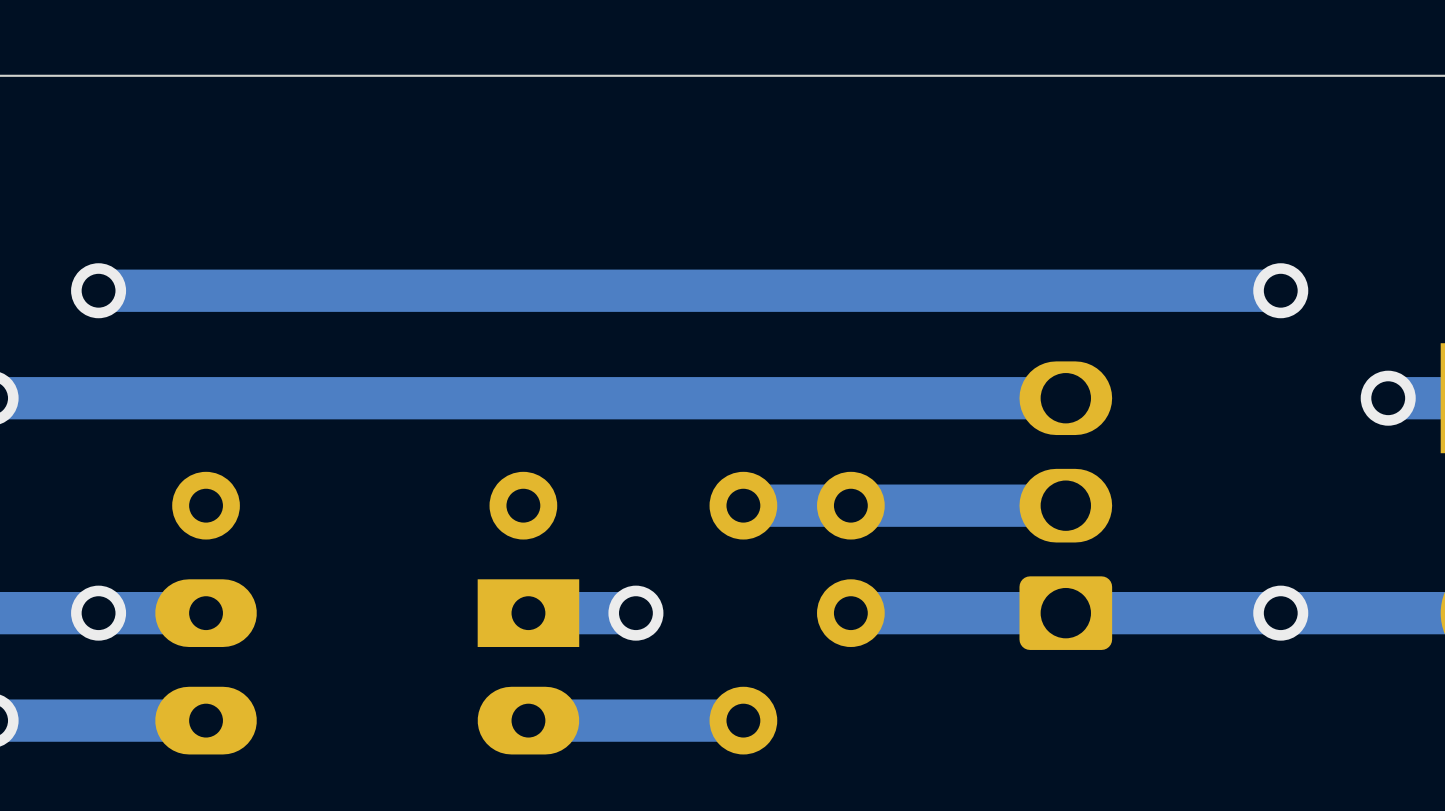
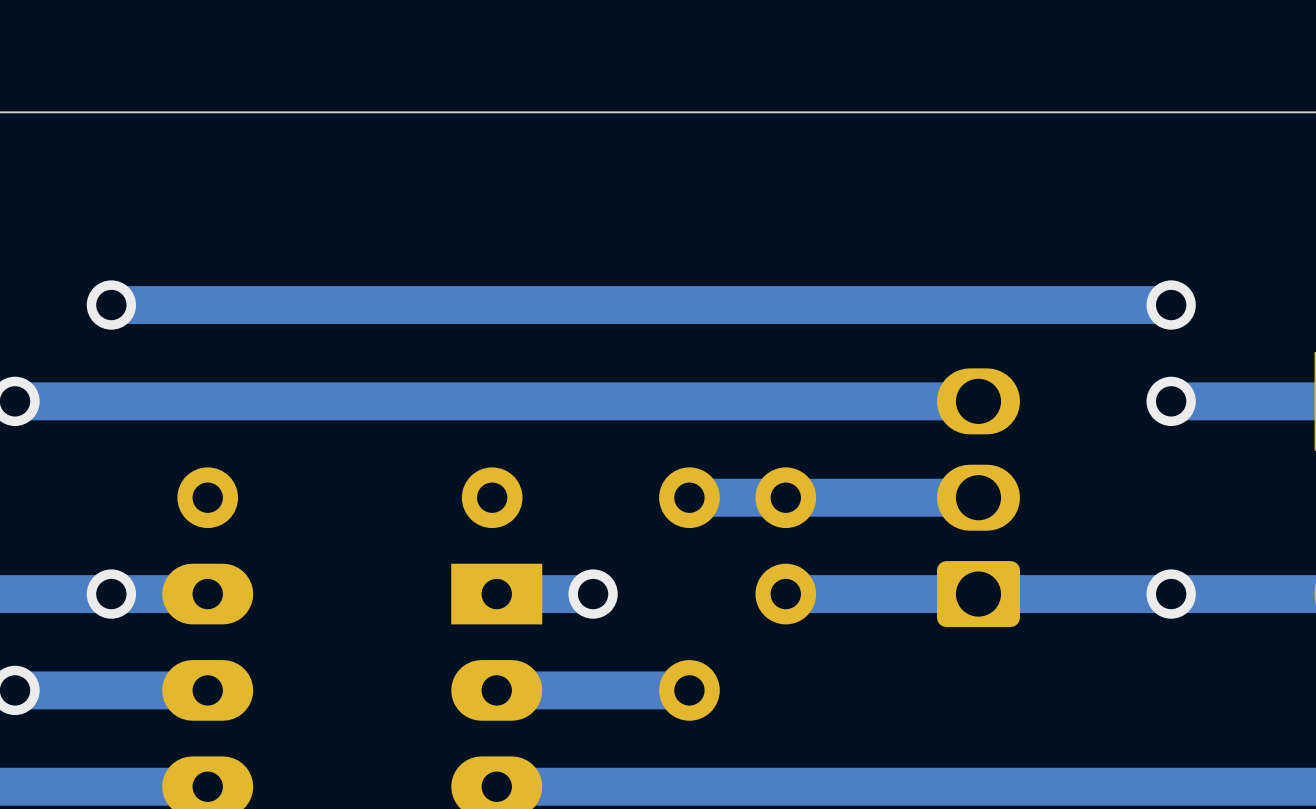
track: none -> (1267, 401) (1171, 401)
via position: (1388, 398) -> (1171, 401)

